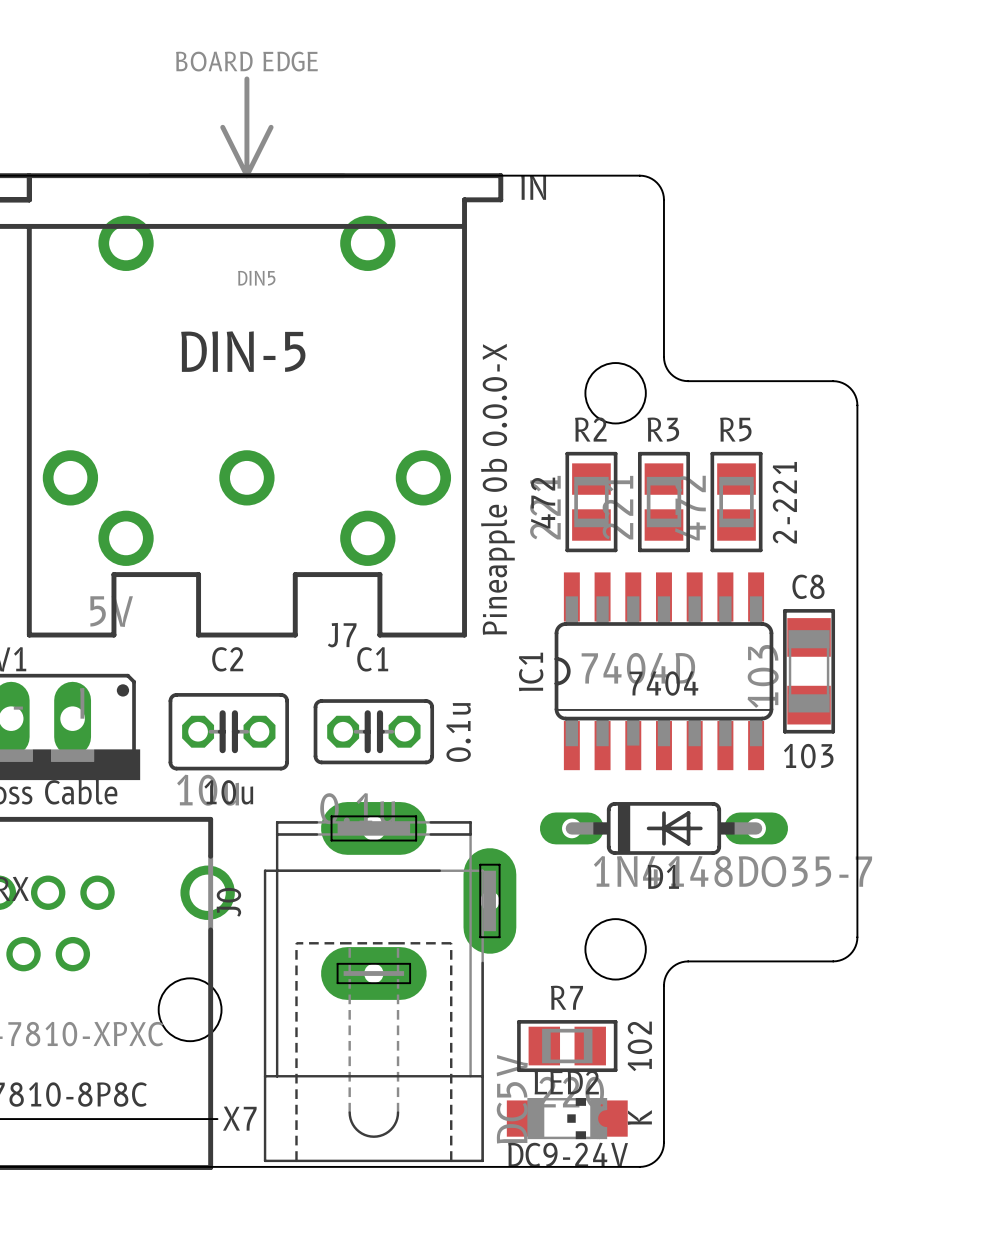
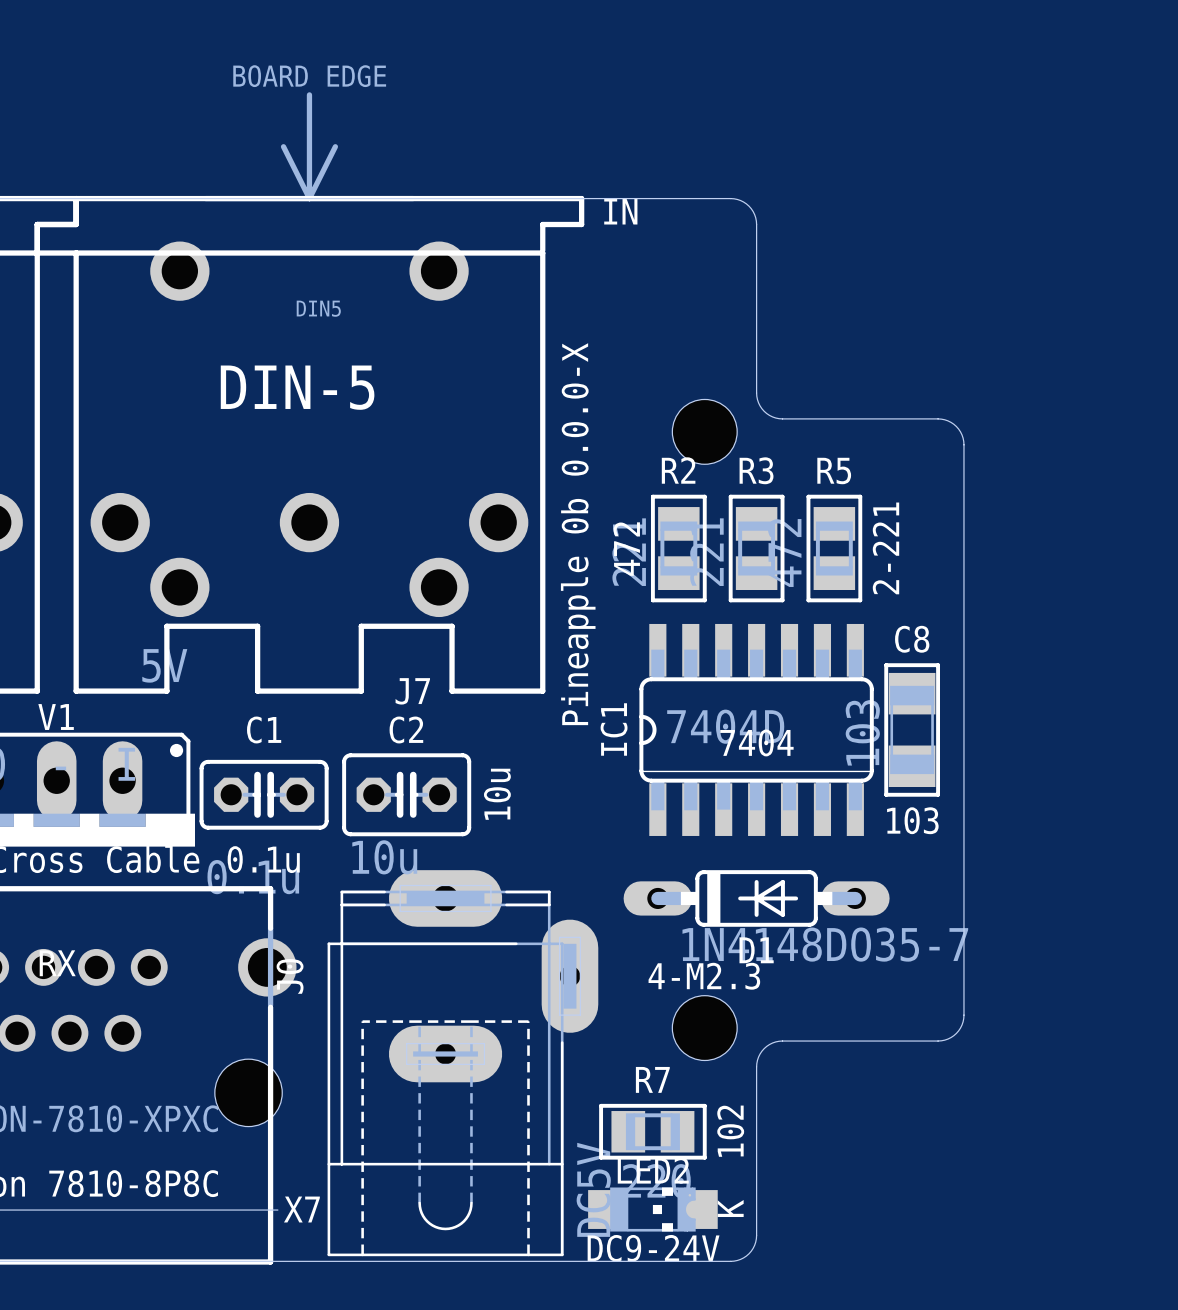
C2 name position: C2 (227, 659) -> C2 (406, 729)
C1 name position: C1 (372, 659) -> C1 (264, 729)
C2 position: (228, 731) -> (406, 794)
C1 position: (373, 731) -> (264, 794)
text: none -> 10u (497, 794)
text: 0.1u (458, 732) -> none
text: 10u (228, 792) -> 0.1u (263, 859)
text: none -> 4-M2.3 (704, 976)

